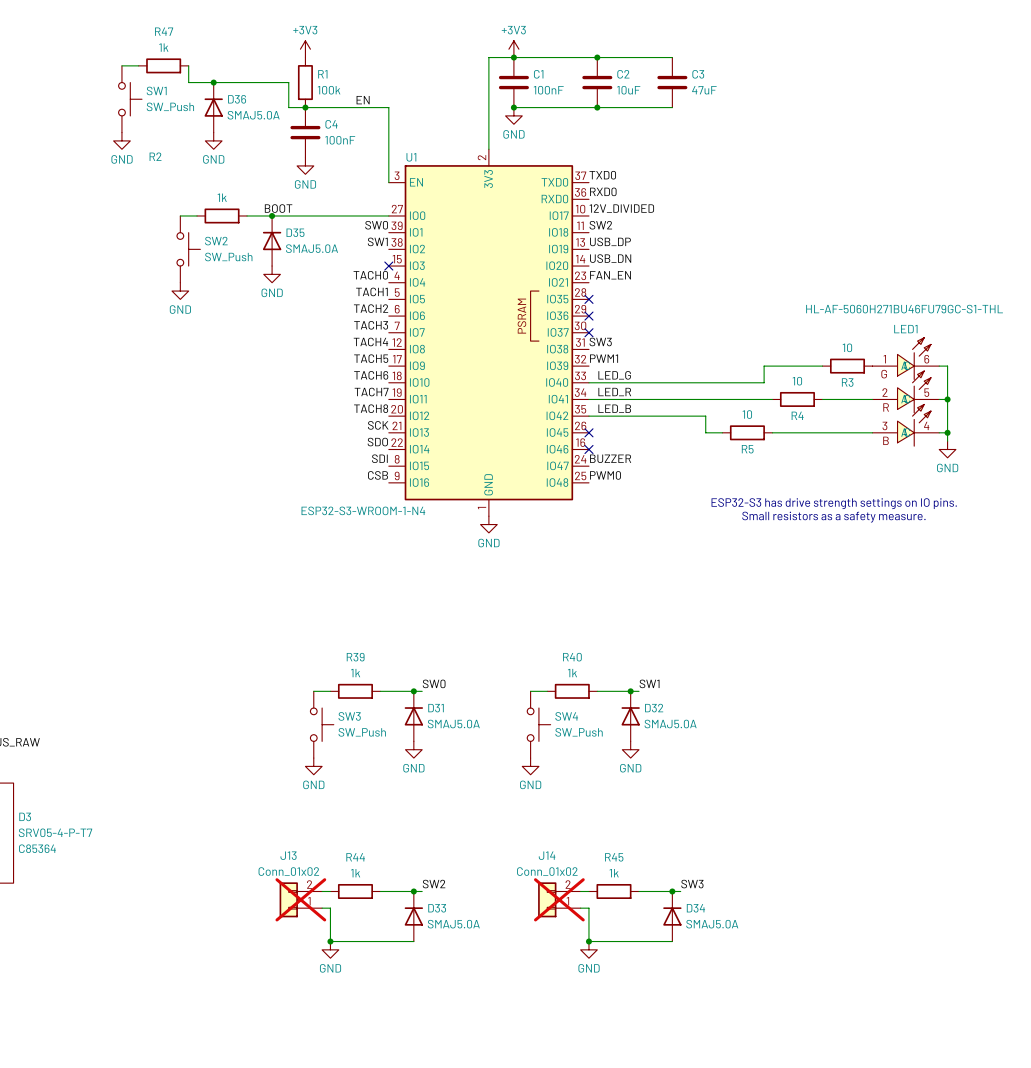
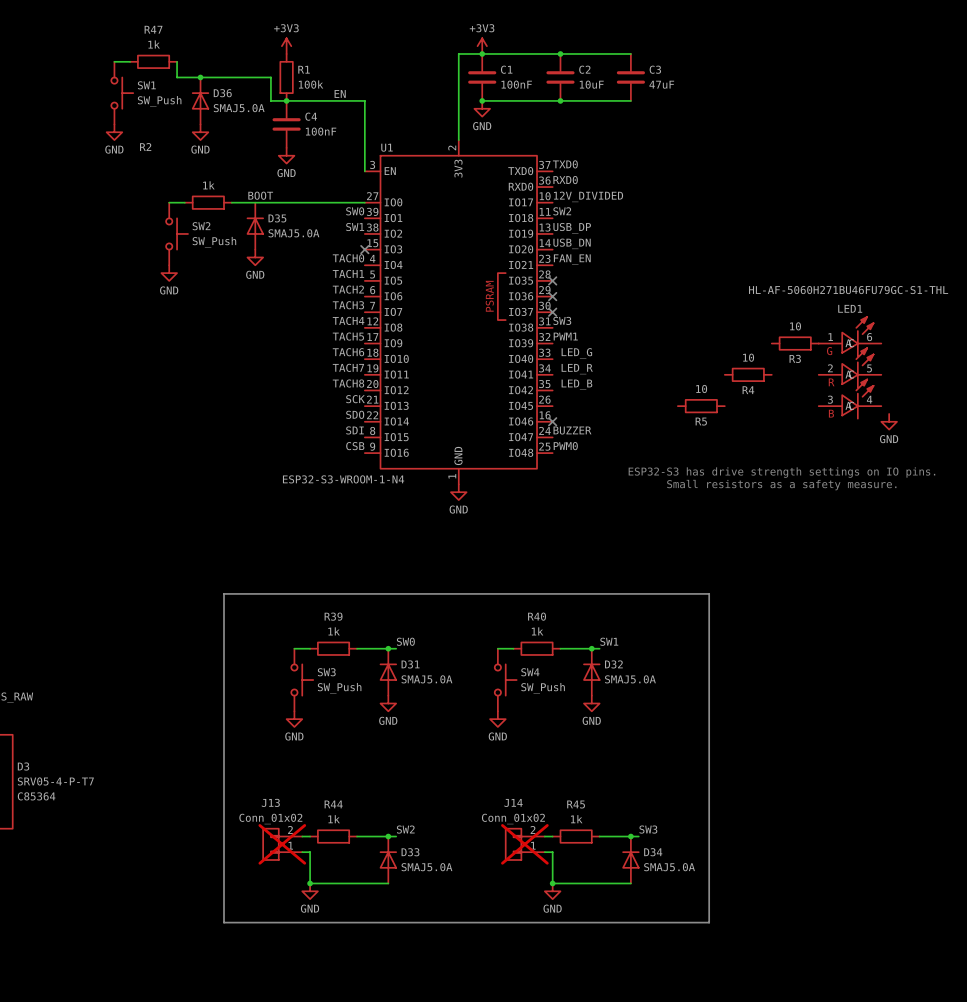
junction: (272, 215) -> none
wire: (822, 366) (764, 366) (764, 382) (588, 382) -> none
wire: (939, 366) (947, 366) (947, 441) -> none
wire: (588, 399) (772, 399) -> none
wire: (822, 399) (872, 399) -> none
wire: (939, 399) (947, 399) -> none
junction: (947, 399) -> none
wire: (588, 416) (705, 416) (705, 432) (722, 432) -> none
no-connect mark: (588, 432) -> none
wire: (772, 432) (872, 432) -> none
wire: (939, 432) (947, 432) -> none
junction: (947, 432) -> none
line: none -> (224, 593) (224, 922) (709, 922) (709, 593) (224, 593)

